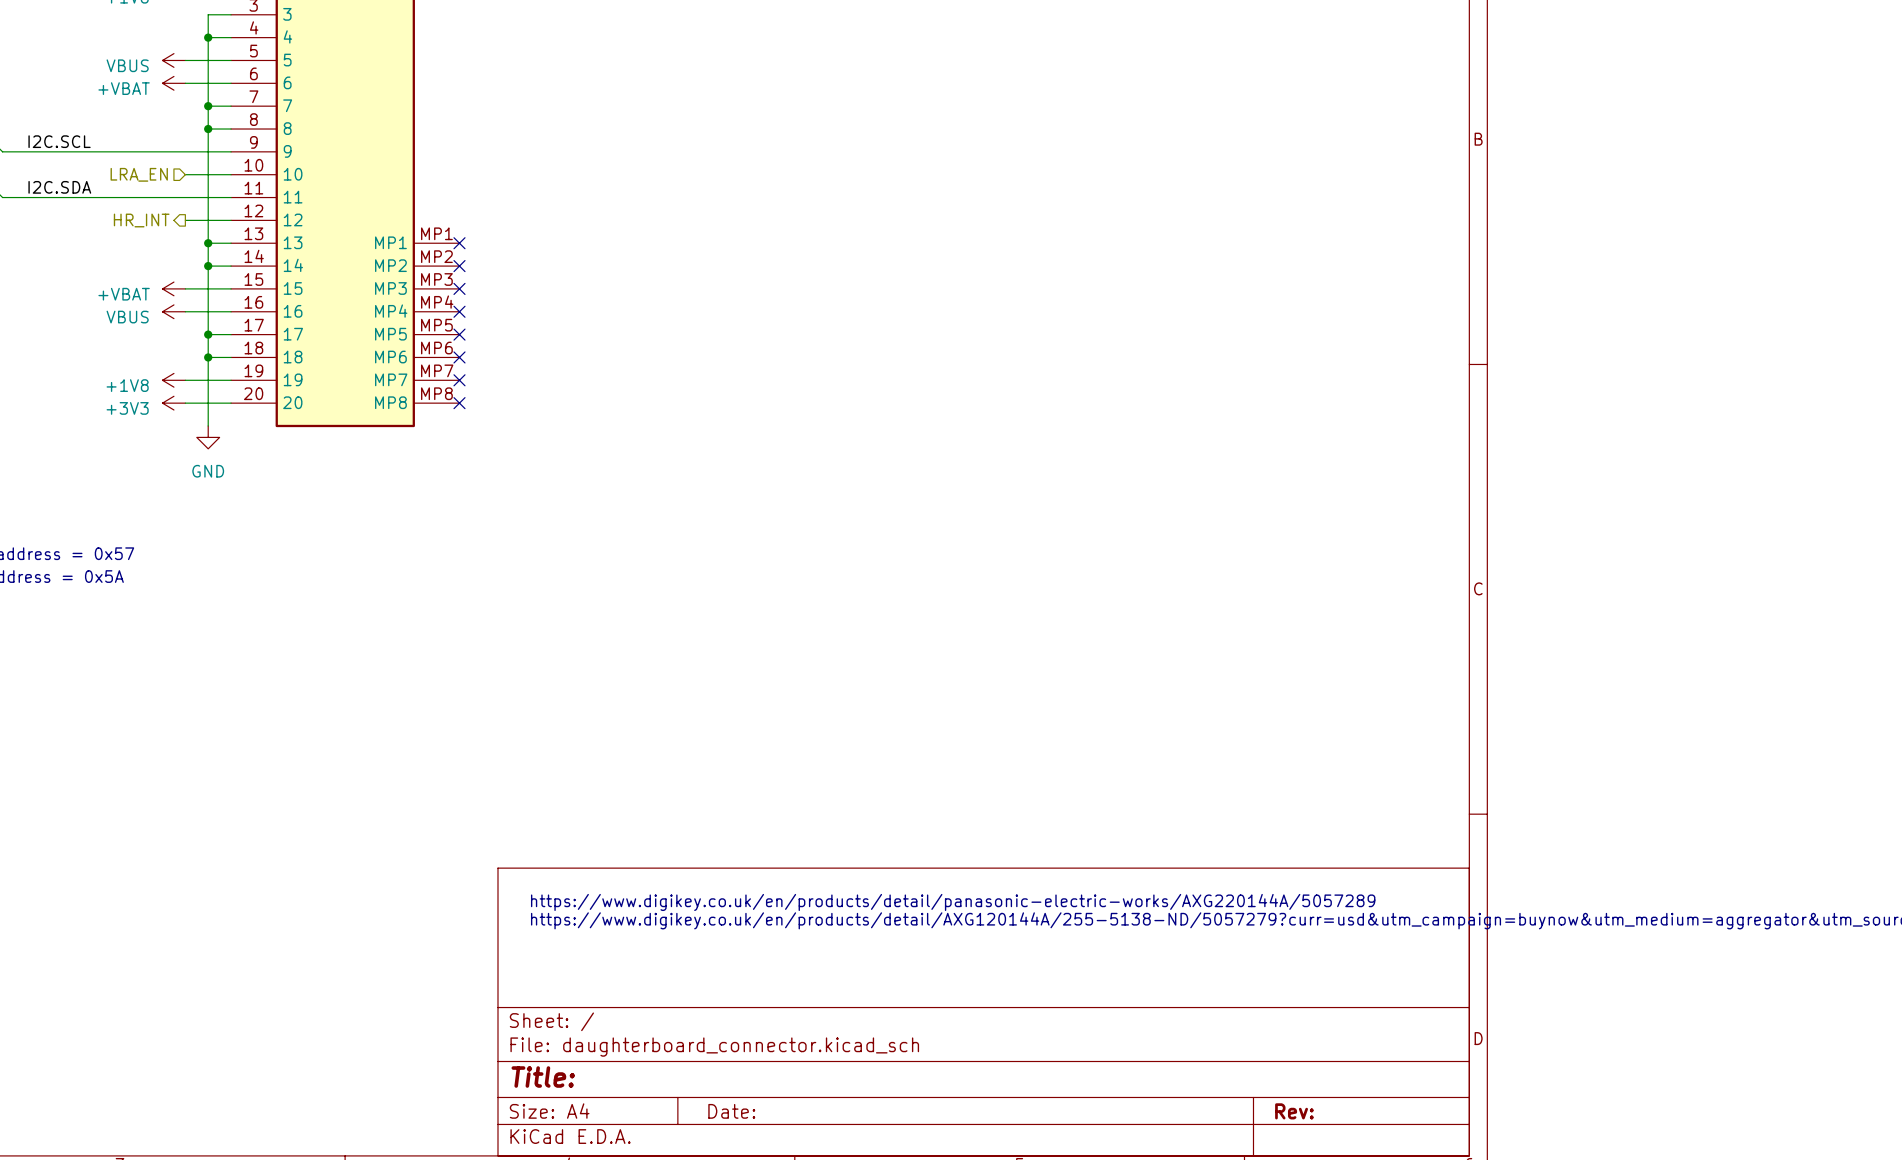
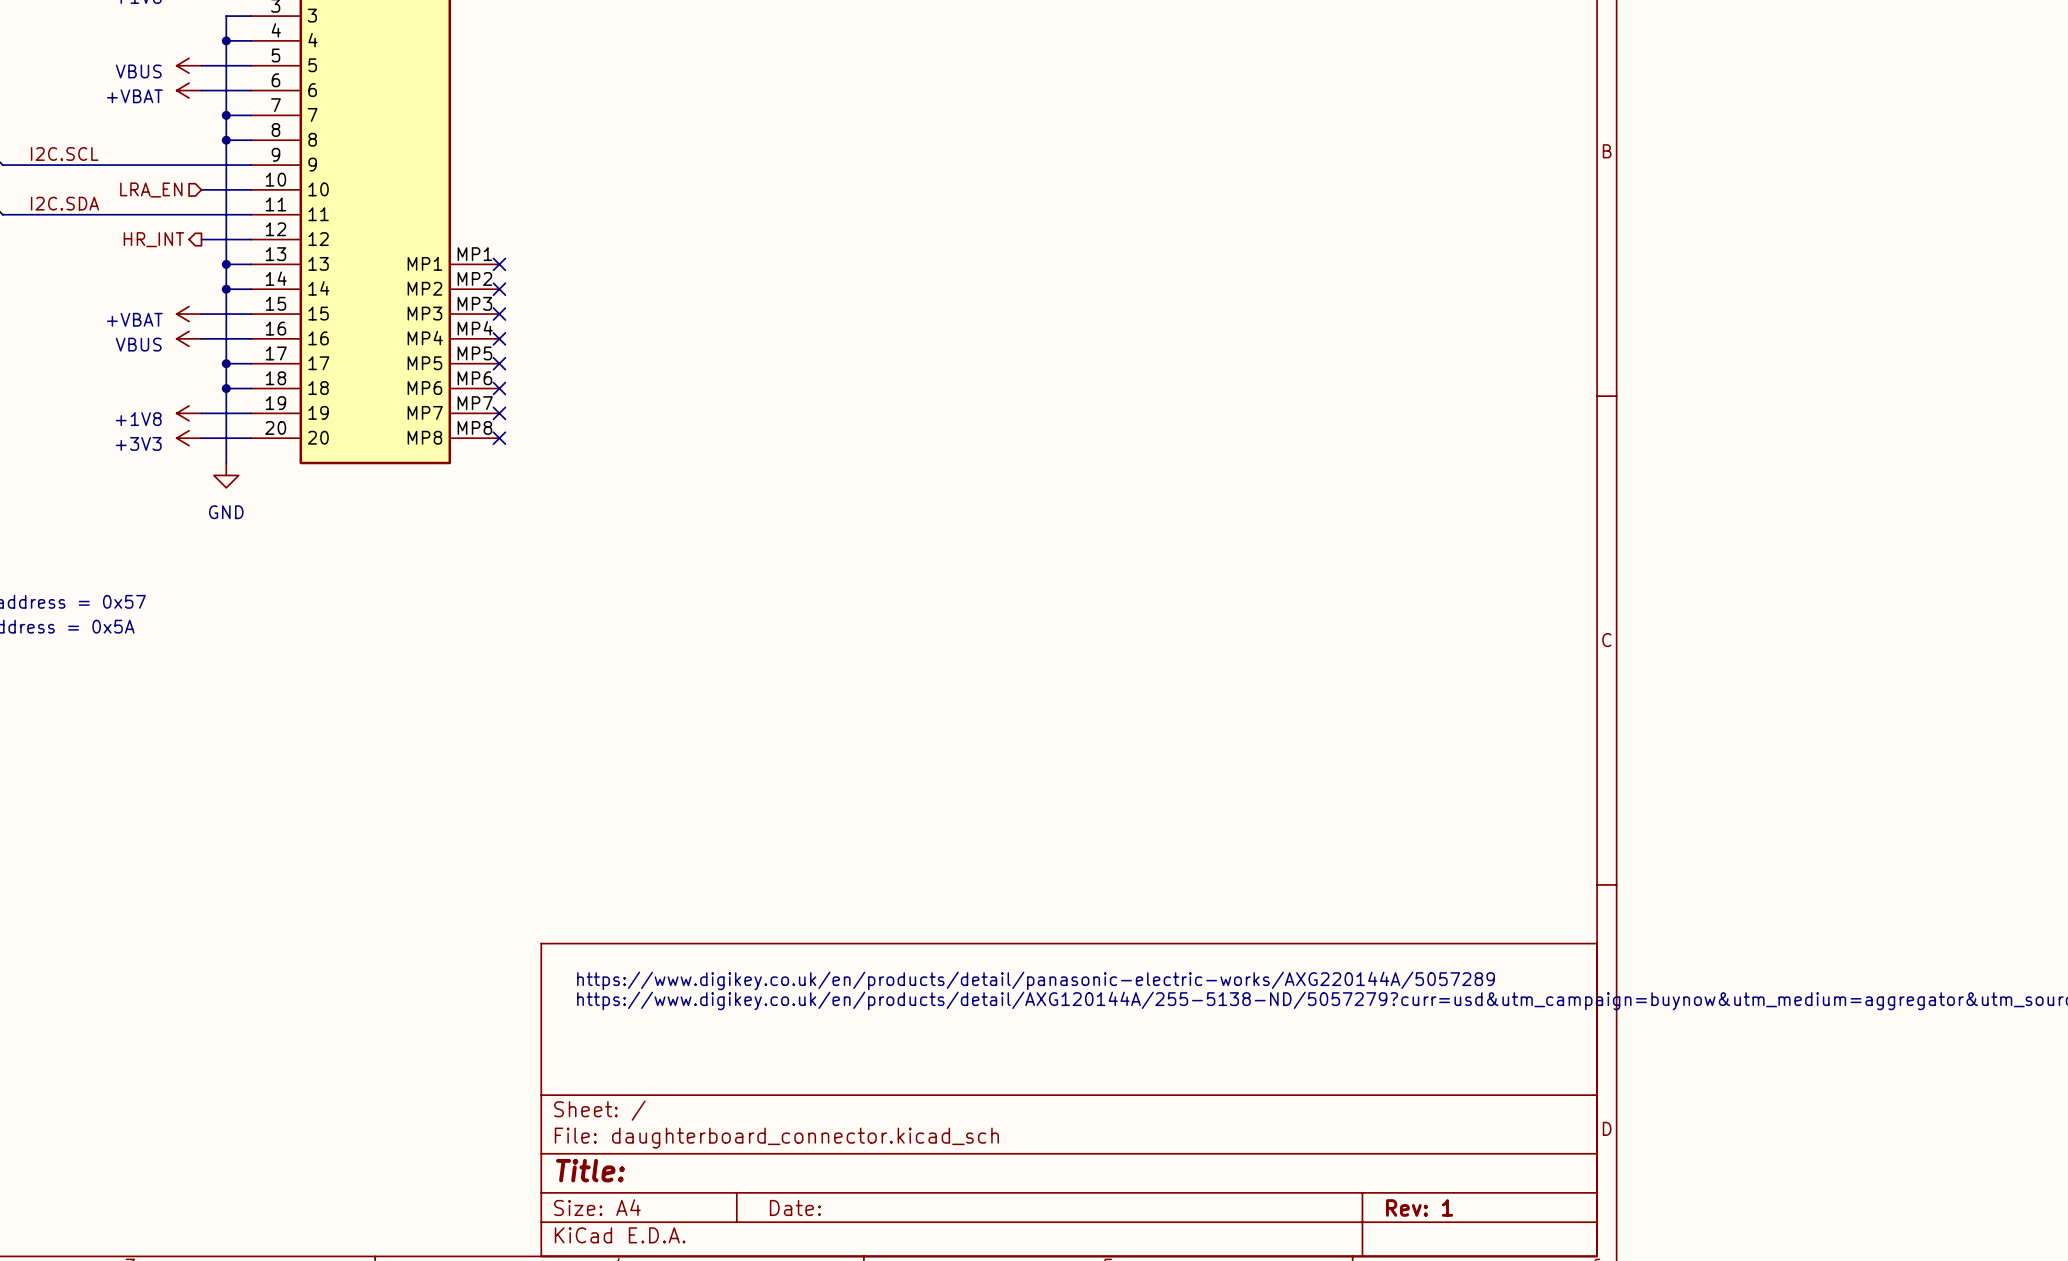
title block: Rev: (1294, 1111) -> Rev: 1 (1419, 1207)

